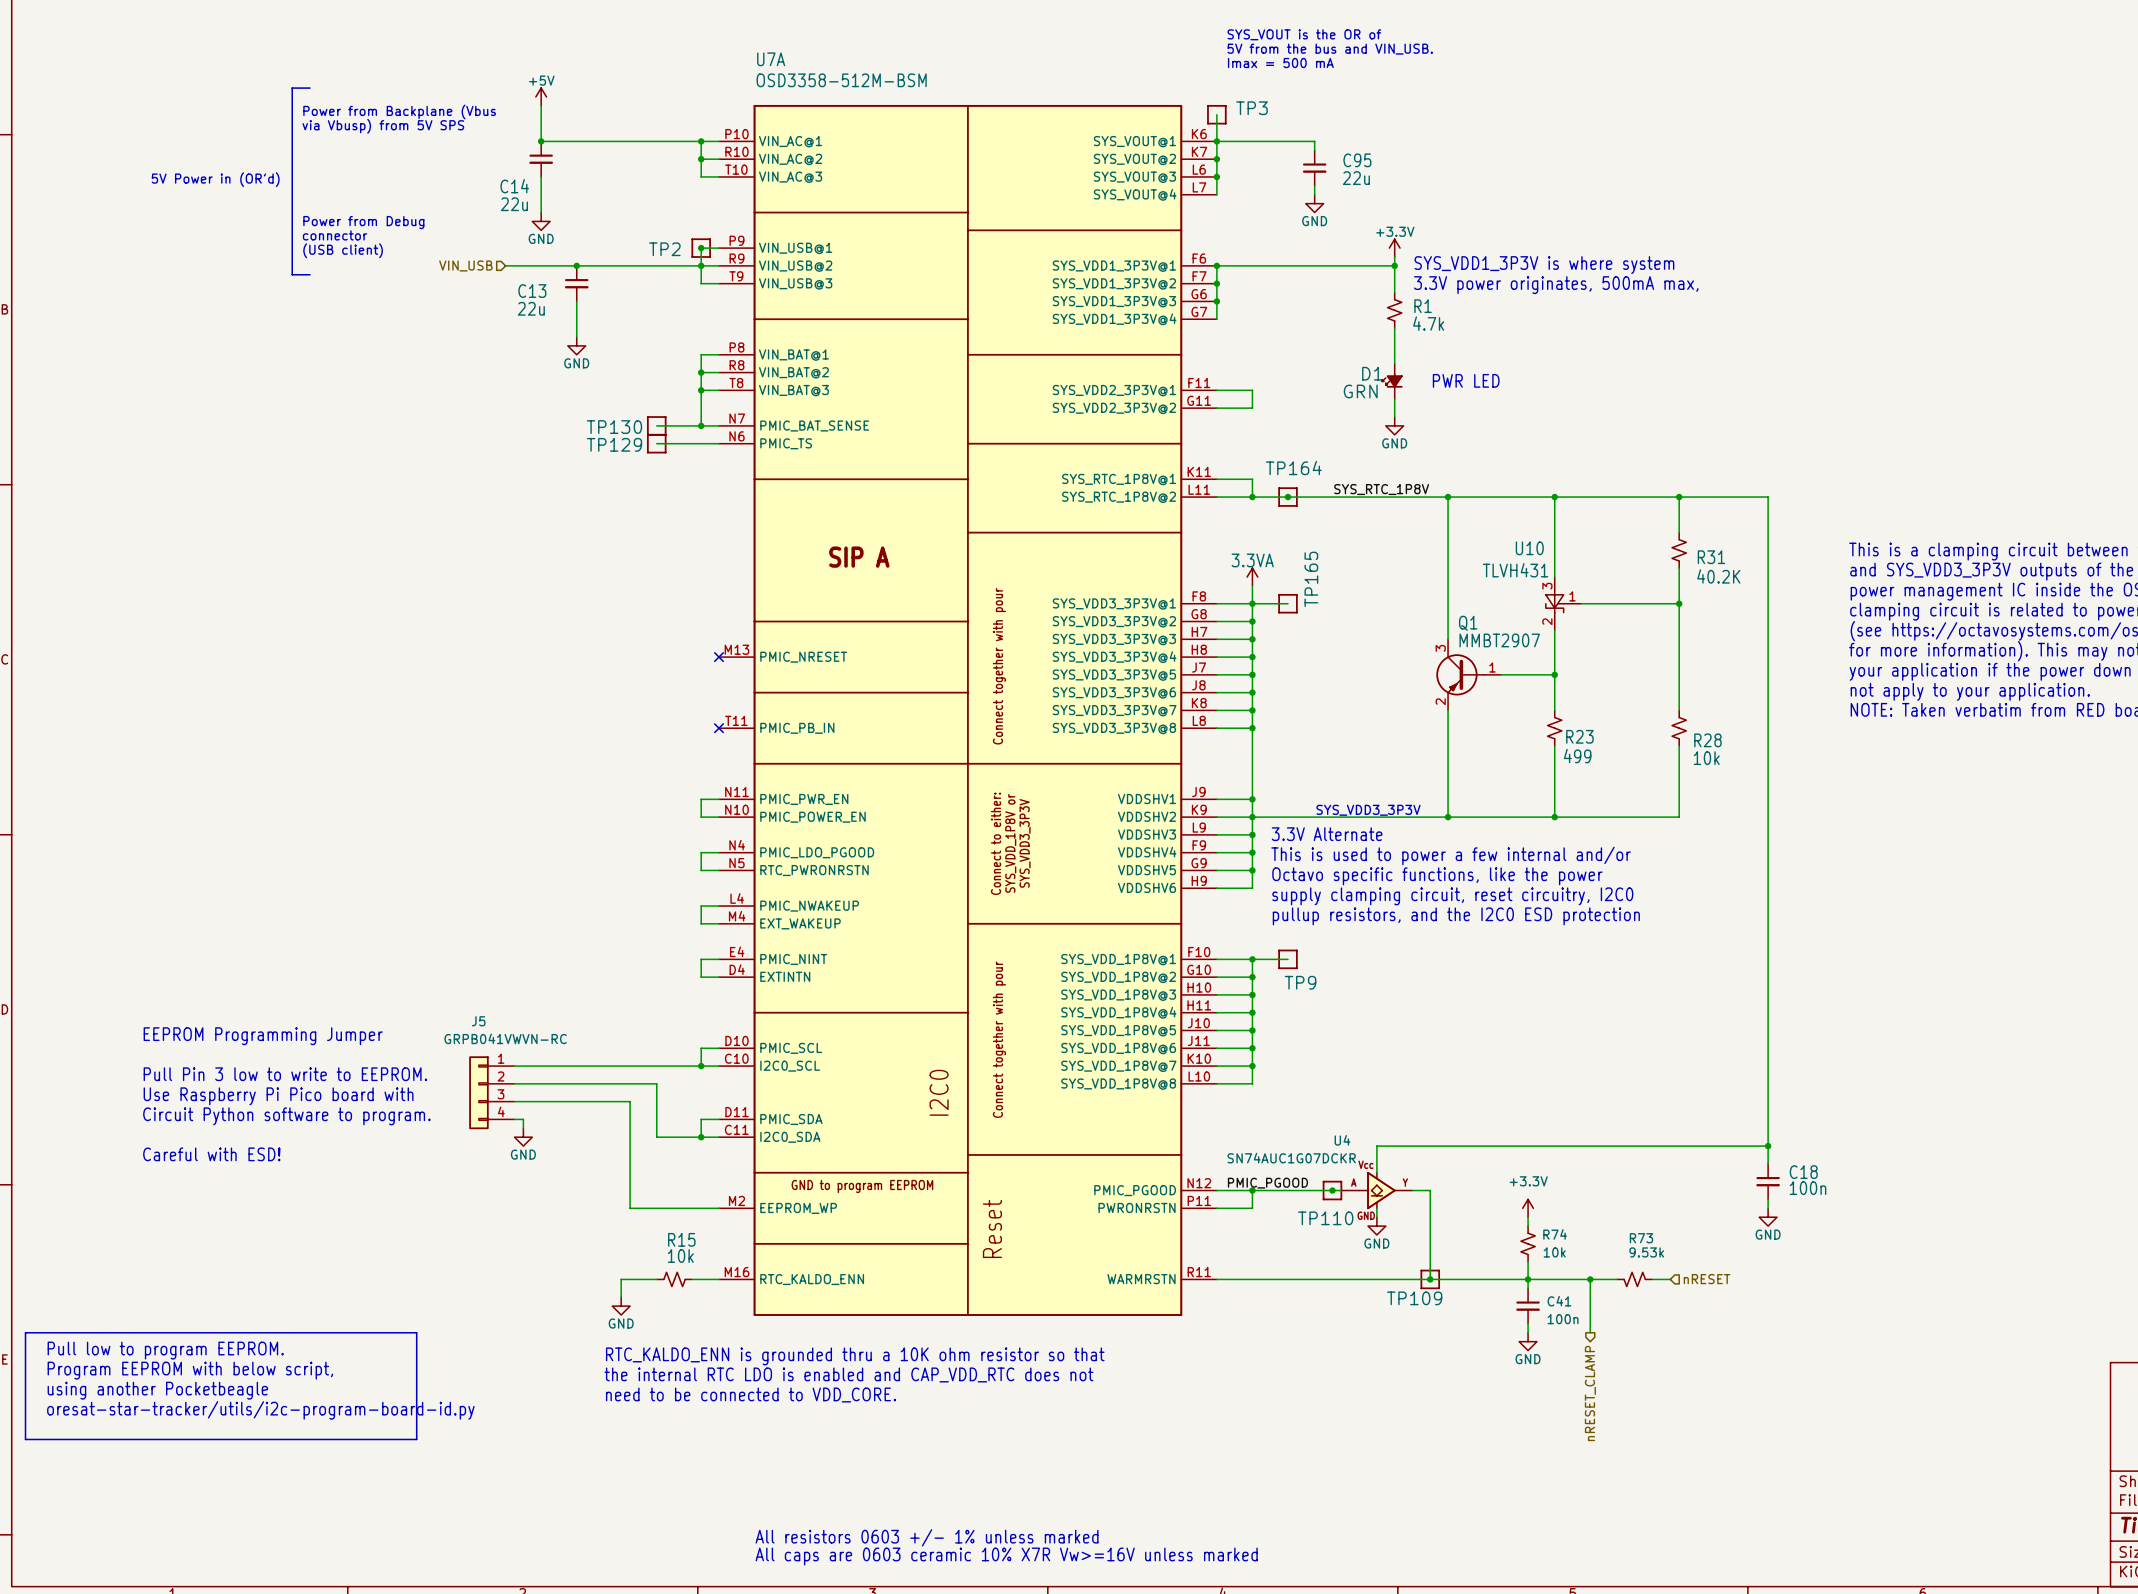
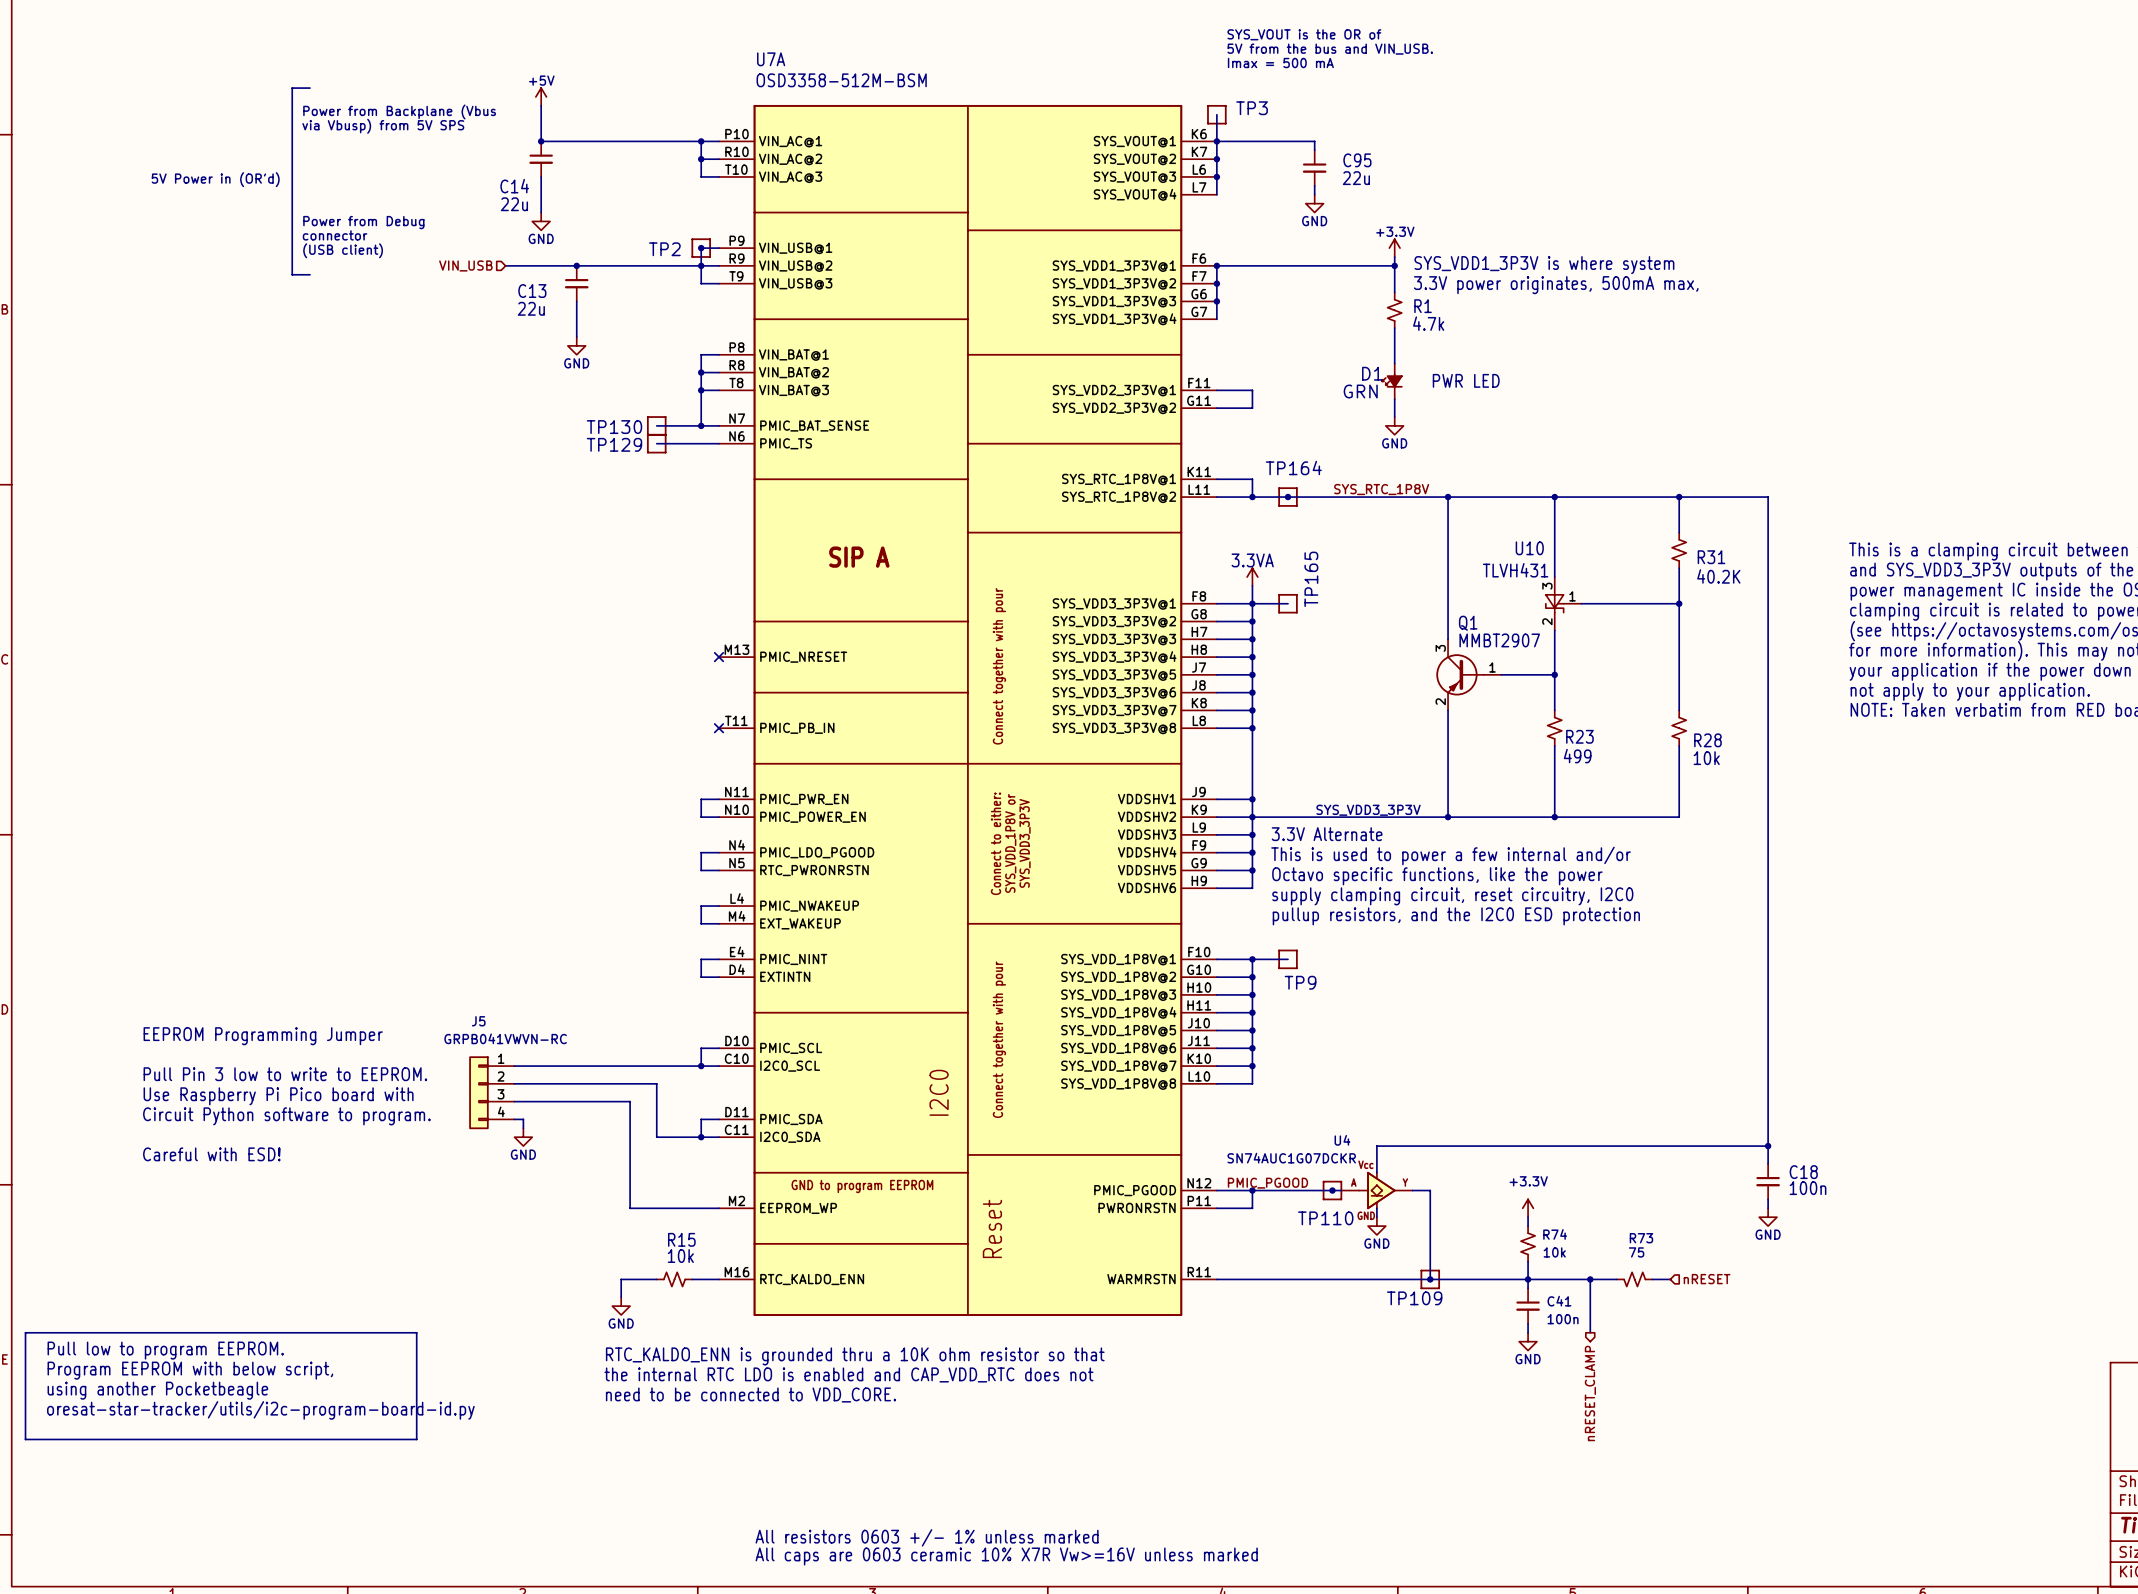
R73 value: 9.53k (1646, 1252) -> 75 (1636, 1252)

